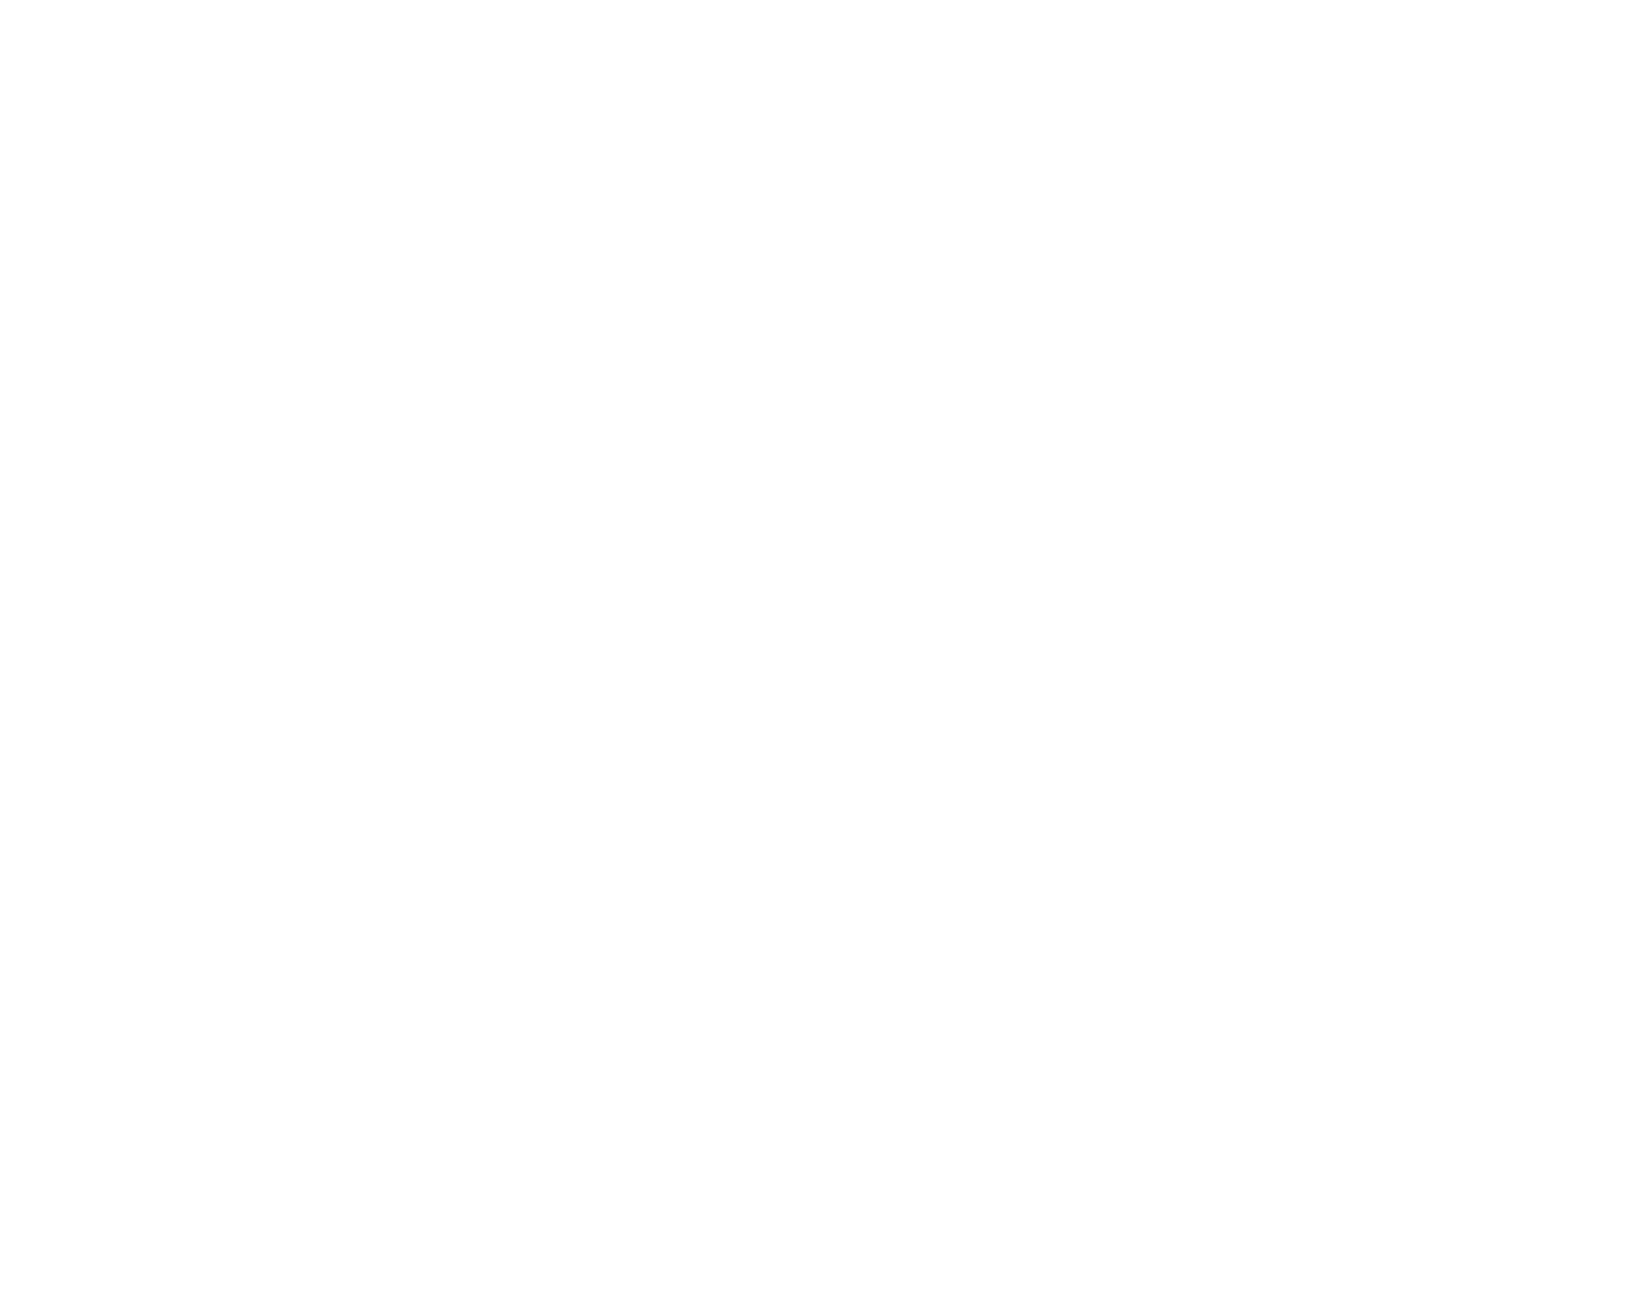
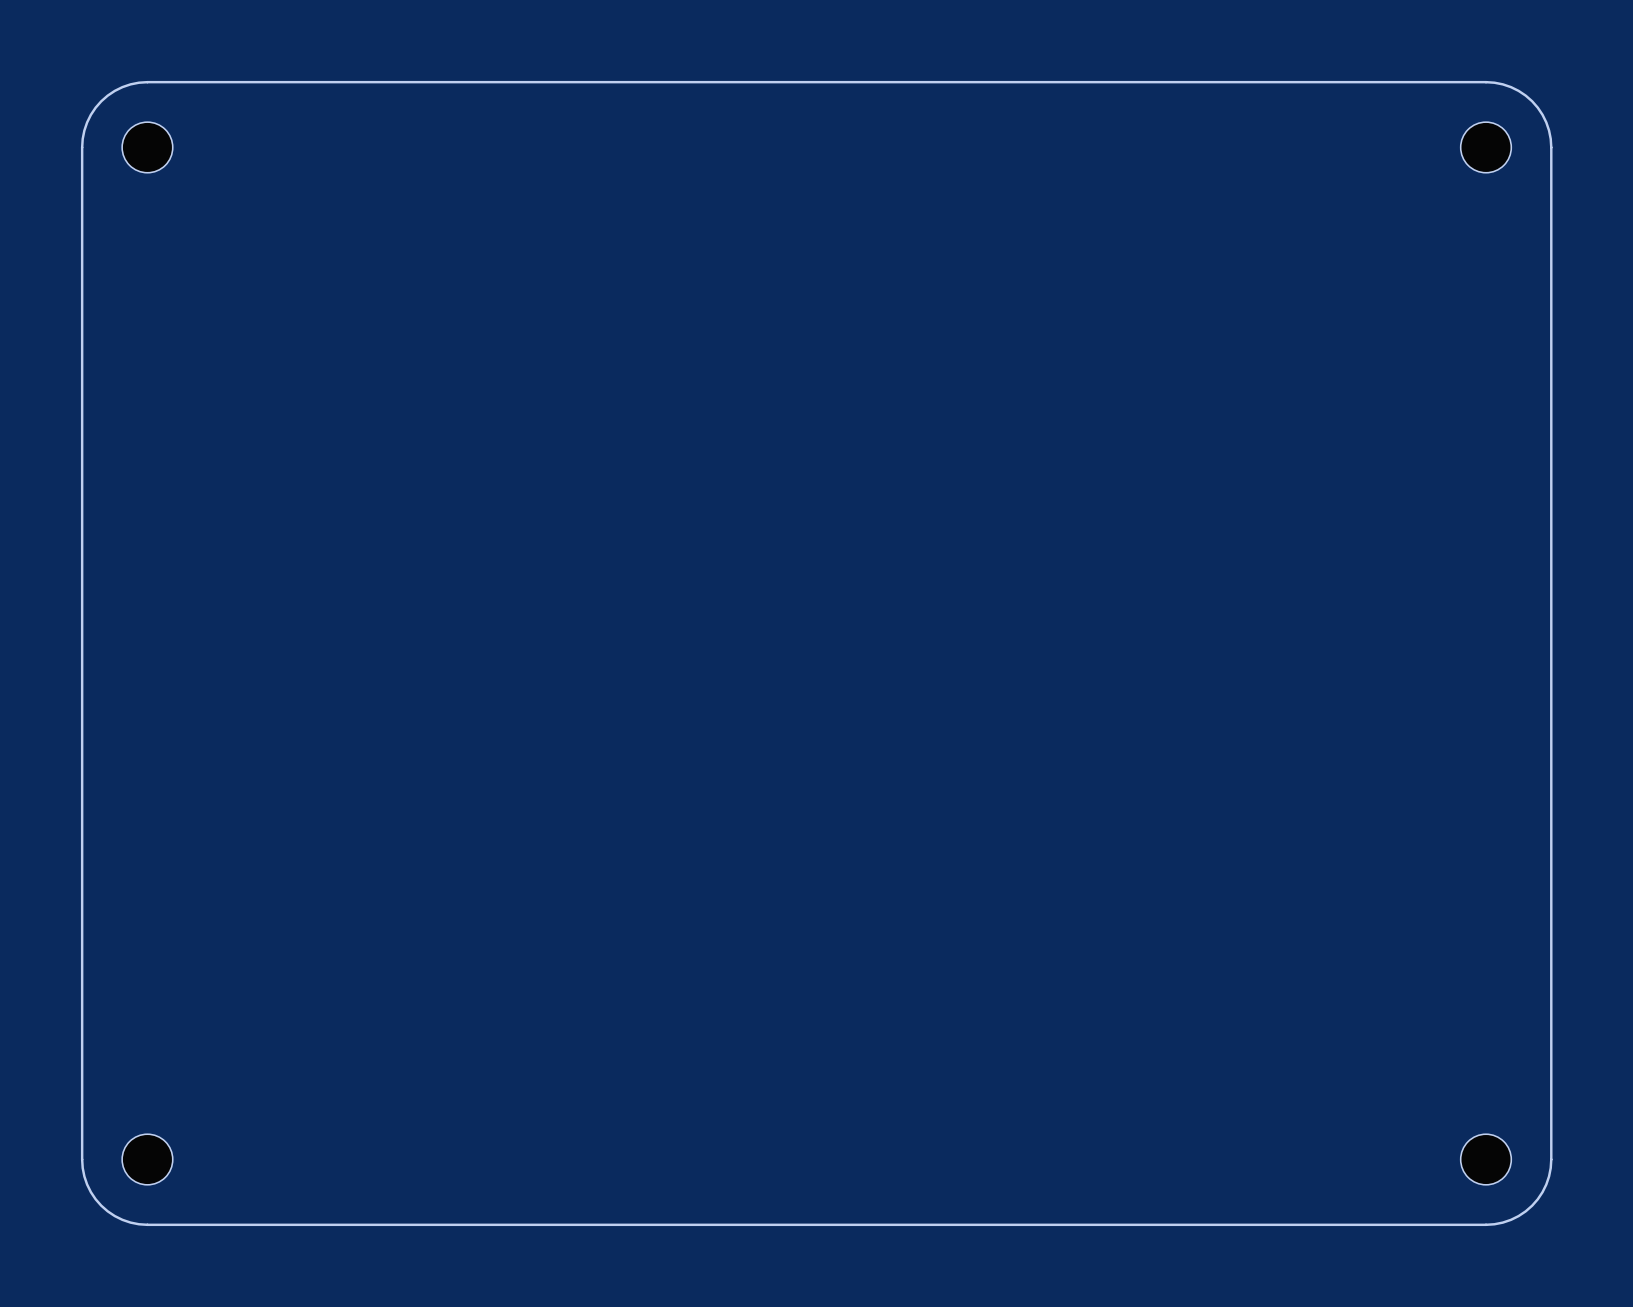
board edge: none -> (1485, 82) (147, 82) (122, 87) (107, 95) (95, 107) (87, 122) (82, 147) (82, 1159) (84, 1176) (95, 1199) (107, 1211) (122, 1219) (147, 1224) (1485, 1224) (1502, 1222) (1525, 1211) (1537, 1199) (1546, 1184) (1551, 1159) (1551, 147) (1546, 122) (1532, 101) (1510, 87) (1485, 82)
part: none -> (147, 147)
part: none -> (1485, 147)
part: none -> (147, 1159)
part: none -> (1485, 1159)

